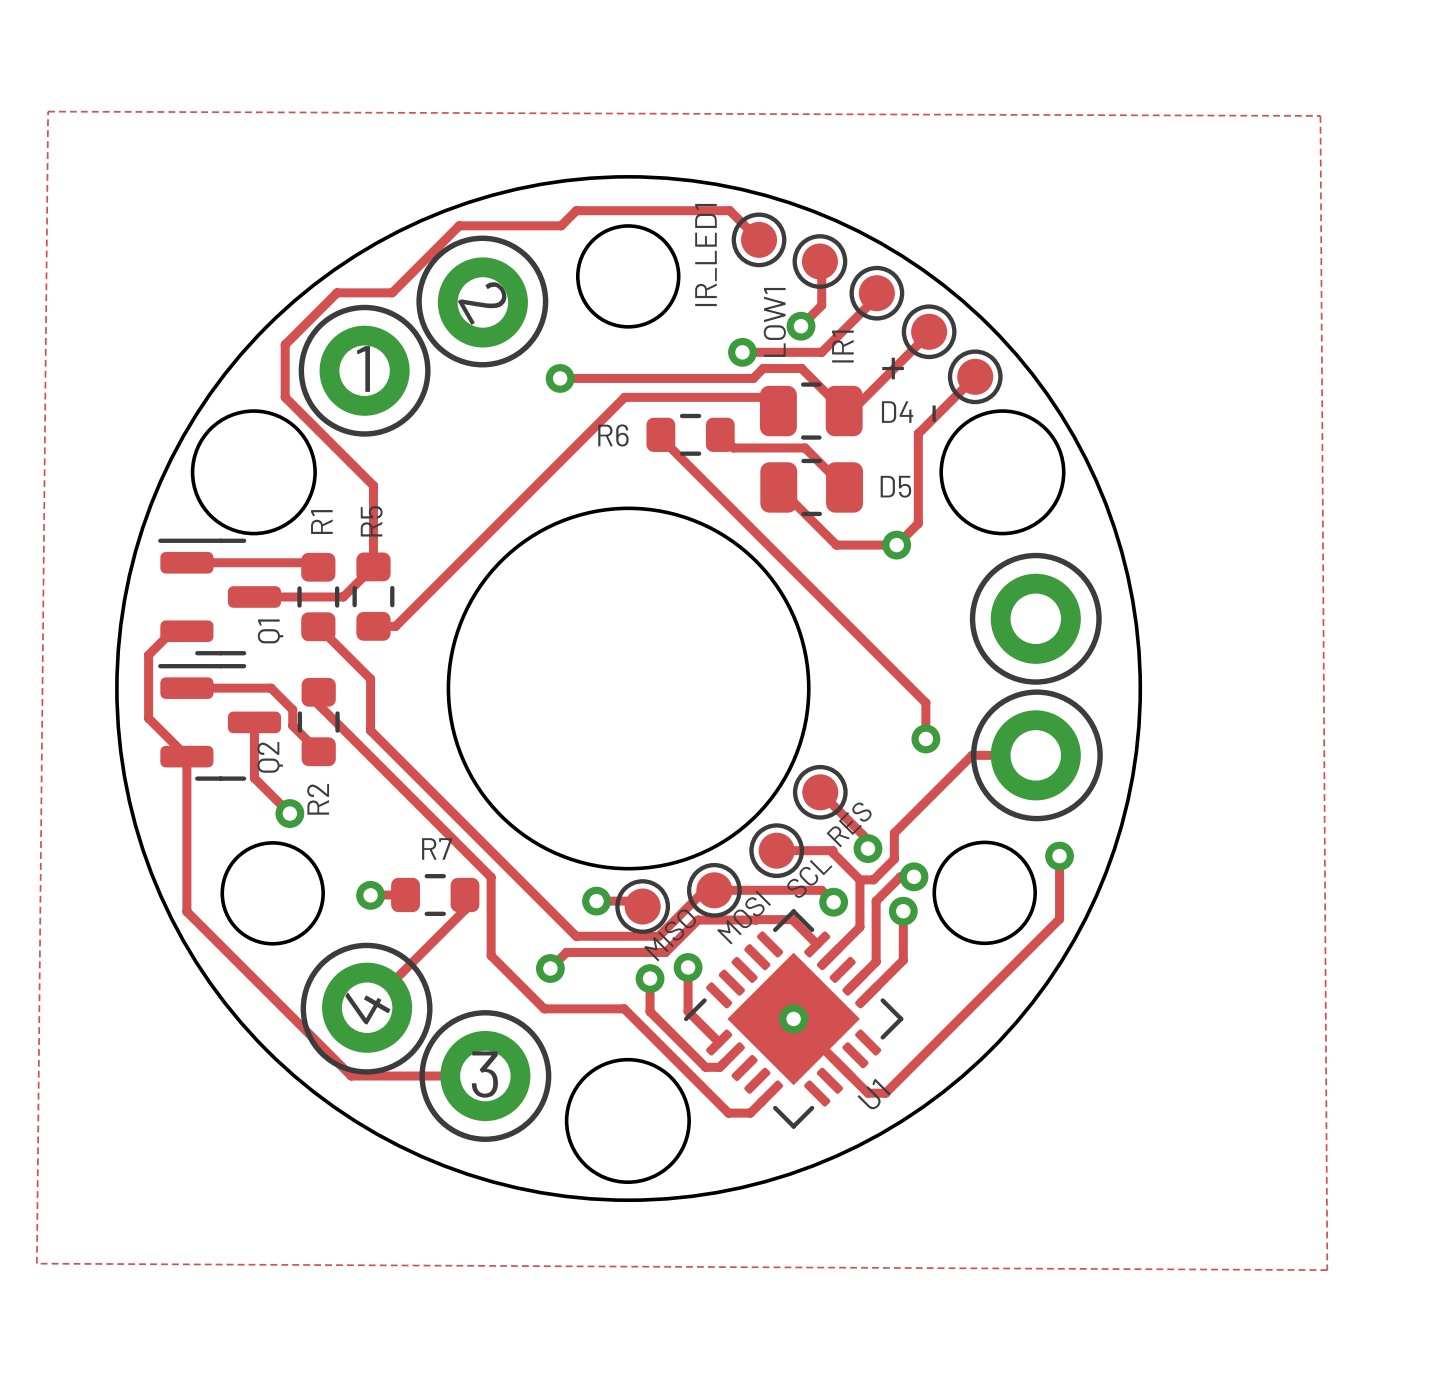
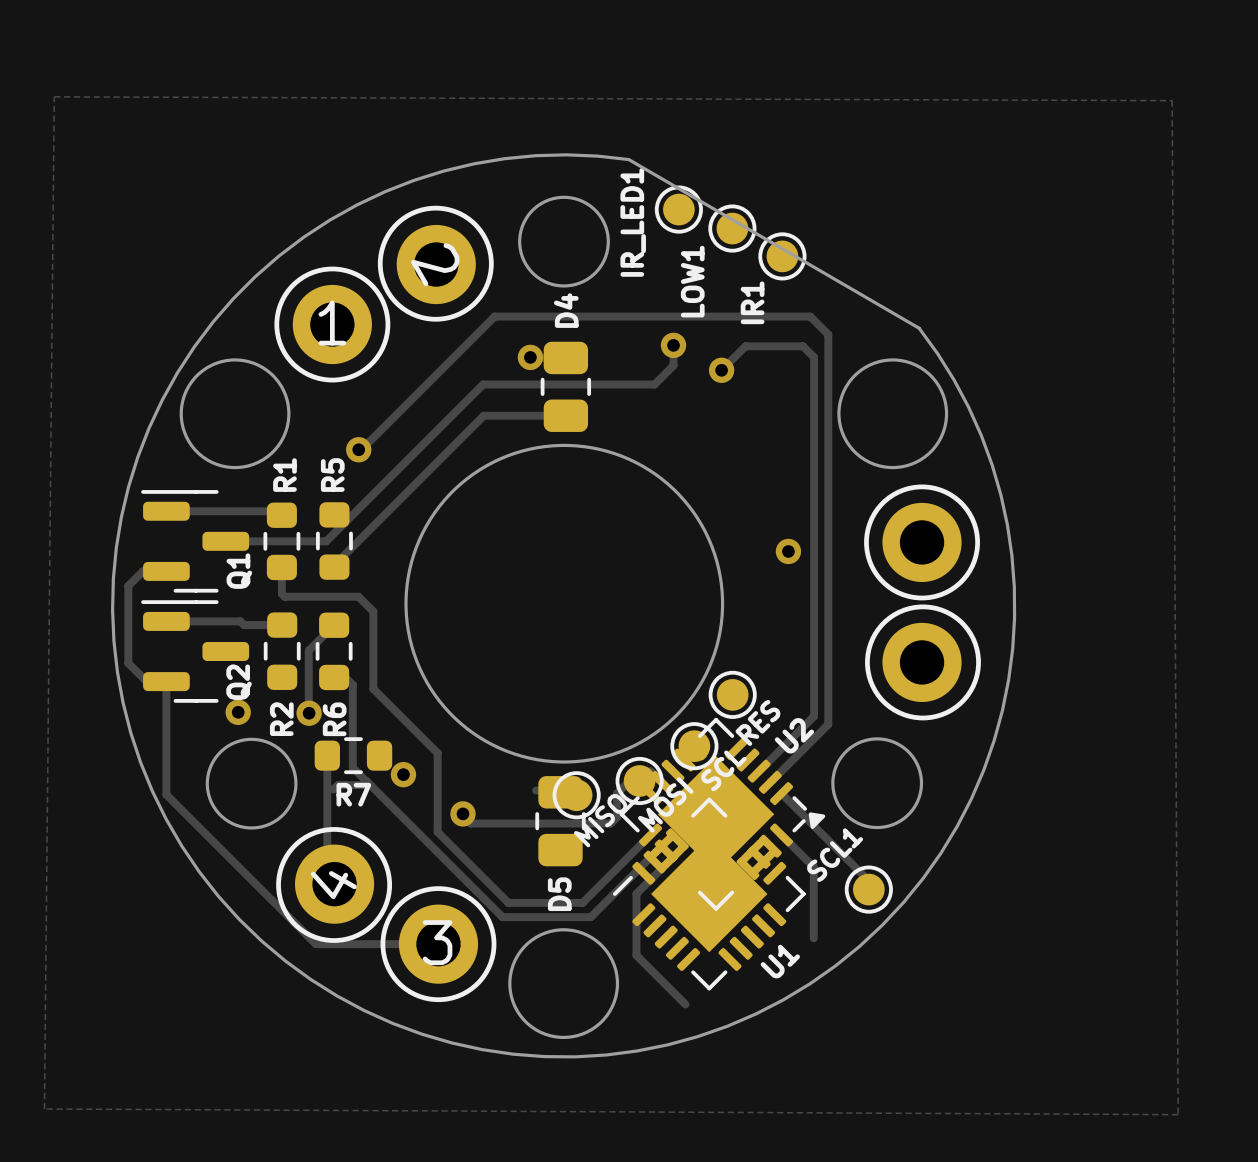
round board edge: [115, 175, 1143, 1203] -> none
board edge: none -> (628, 159) (919, 328) (937, 353) (968, 407) (981, 435) (1000, 494) (1011, 555) (1014, 618) (1012, 649) (1002, 710) (983, 769) (971, 798) (941, 852) (923, 878) (882, 925) (859, 946) (809, 983) (783, 999) (755, 1014) (697, 1036) (667, 1044) (606, 1054) (575, 1056) (513, 1054) (451, 1042) (422, 1034) (364, 1010) (310, 979) (285, 961) (261, 941) (218, 896) (181, 846) (166, 819) (152, 791) (130, 732) (117, 672) (113, 641) (112, 610) (116, 548) (128, 487) (137, 457) (162, 400) (194, 346) (213, 322) (233, 298) (278, 256) (329, 220) (356, 204) (385, 191) (443, 171) (474, 163) (535, 155) (597, 156) (628, 159)
track: (761, 242) (729, 210) (576, 210) (561, 225) (459, 225) (392, 292) (337, 292) (285, 344) (285, 397) (373, 485) (373, 566) (343, 596) (254, 596) -> none
track: (821, 264) (821, 305) (801, 326) -> none
track: (878, 295) (821, 352) (742, 352) -> none
via: (801, 326) -> none
part: (929, 331) -> none
track: (930, 332) (851, 411) (844, 411) (801, 368) (763, 368) (753, 378) (560, 378) -> none
via: (742, 352) -> none
track: (975, 376) (918, 433) (918, 523) (896, 545) (836, 545) (778, 487) -> none
part: (975, 376) -> none
via position: (560, 378) -> (530, 357)
track: none -> (673, 345) (673, 365) (654, 384) (483, 384) (326, 541) (225, 541)
via: none -> (673, 345)
track: (778, 411) (764, 397) (624, 397) (395, 626) (373, 626) -> none
D4 rotation: 0° (811, 411) -> 90° clockwise (565, 386)
D4 position: (811, 411) -> (565, 386)
D4 name position: D4 (897, 412) -> D4 (566, 310)
track: none -> (721, 370) (745, 346) (802, 346) (814, 357) (814, 716) (759, 771)
via: none -> (721, 370)
track: (660, 434) (660, 437) (925, 702) (925, 738) -> none
R6 rotation: 0° (690, 434) -> 90° clockwise (334, 651)
R6 position: (690, 434) -> (334, 651)
track: (720, 434) (733, 447) (805, 447) (844, 487) -> none
R6 name position: R6 (613, 435) -> R6 (334, 719)
track: none -> (565, 415) (483, 415) (334, 567)
D5 rotation: 0° (811, 487) -> 90° clockwise (560, 821)
D5 position: (811, 487) -> (560, 821)
track: none -> (358, 449) (361, 449) (494, 316) (810, 316) (828, 334) (828, 724) (770, 782)
via: none -> (358, 449)
via: (896, 545) -> none
track: (186, 562) (313, 562) (318, 567) -> (166, 511) (277, 511) (281, 515)
Q1 position: (219, 596) -> (195, 541)
R1 position: (318, 596) -> (281, 541)
R5 position: (373, 596) -> (334, 541)
track: (318, 626) (370, 678) (370, 730) (576, 936) (658, 936) (704, 890) (821, 890) (833, 902) -> none
via: none -> (788, 551)
track: (186, 631) (172, 631) (148, 655) (148, 718) (186, 756) (186, 911) (351, 1076) -> (166, 571) (142, 571) (128, 585) (128, 663) (146, 681) (166, 681) (166, 794) (315, 944) (320, 944)
track: none -> (281, 567) (281, 593) (284, 596) (358, 596) (373, 611) (373, 688) (437, 753) (437, 832) (508, 902) (582, 902) (650, 834)
track: (186, 688) (271, 688) (292, 709) (292, 725) (318, 751) -> none
track: (318, 692) (318, 704) (491, 877) (491, 955) (544, 1008) (624, 1008) (728, 1113) (750, 1113) (762, 1101) -> none
track: none -> (166, 621) (240, 621) (244, 625) (282, 625)
track: none -> (334, 625) (308, 650) (308, 712)
Q2 position: (219, 722) -> (195, 651)
track: (254, 722) (254, 778) (289, 813) -> none
R2 position: (318, 722) -> (282, 651)
via: (925, 738) -> none
track: (1035, 755) (972, 755) (894, 833) (894, 859) (873, 879) (859, 879) -> none
track: none -> (330, 677) (345, 677) (352, 684) (352, 767) (366, 781)
track: (820, 792) (867, 839) (867, 848) -> none
via: none -> (238, 712)
via: (289, 813) -> none
via: none -> (309, 713)
R7 name position: R7 (437, 848) -> R7 (353, 794)
via: (867, 848) -> none
track: (776, 850) (832, 850) (859, 879) -> none
track: (1059, 856) (1059, 919) (885, 1093) (867, 1093) (793, 1018) (786, 1026) -> none
via: (1059, 856) -> none
track: (914, 876) (900, 876) (876, 901) (876, 961) (847, 990) -> none
via: (914, 876) -> none
track: (859, 879) (859, 927) (822, 964) -> none
via: none -> (403, 774)
track: none -> (366, 781) (502, 917) (590, 917) (661, 846)
track: none -> (661, 782) (650, 771) (639, 771) (617, 793) (617, 817) (610, 823) (470, 823) (462, 813)
R7 position: (435, 894) -> (353, 755)
track: (464, 894) (464, 909) (367, 1007) -> (327, 755) (327, 876) (334, 884)
via: (370, 895) -> none
via: (596, 901) -> none
via: (833, 902) -> none
track: none -> (781, 793) (868, 880) (868, 889)
track: (903, 911) (903, 960) (860, 1002) -> none
via: (903, 911) -> none
track: (756, 919) (792, 919) (817, 944) -> none
track: (756, 920) (697, 920) (665, 952) (566, 952) (550, 968) -> none
via: none -> (462, 813)
U2: none -> (722, 814)
track: none -> (781, 834) (813, 867) (813, 938)
track: (688, 967) (688, 1011) (719, 1042) -> none
via: (688, 967) -> none
via: (550, 968) -> none
track: none -> (672, 857) (636, 893) (636, 955) (685, 1004)
track: (650, 978) (650, 1011) (705, 1067) (719, 1067) (724, 1062) -> none
via: (650, 978) -> none
SCL1: none -> (868, 889)
via: (793, 1018) -> none

